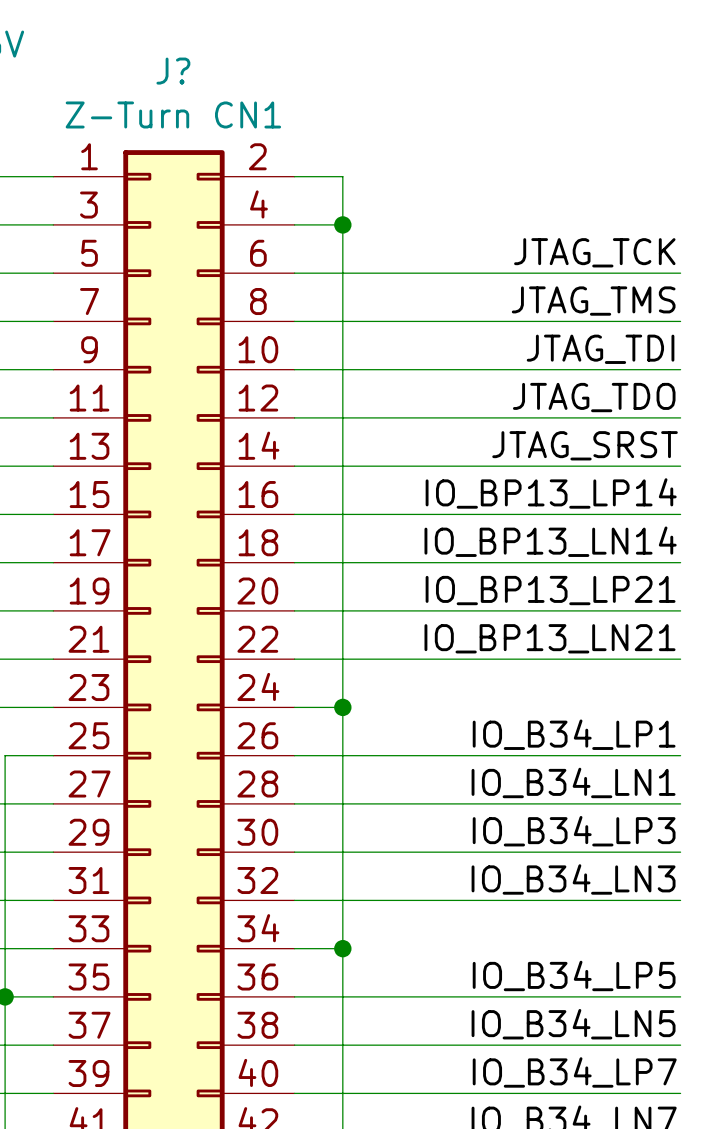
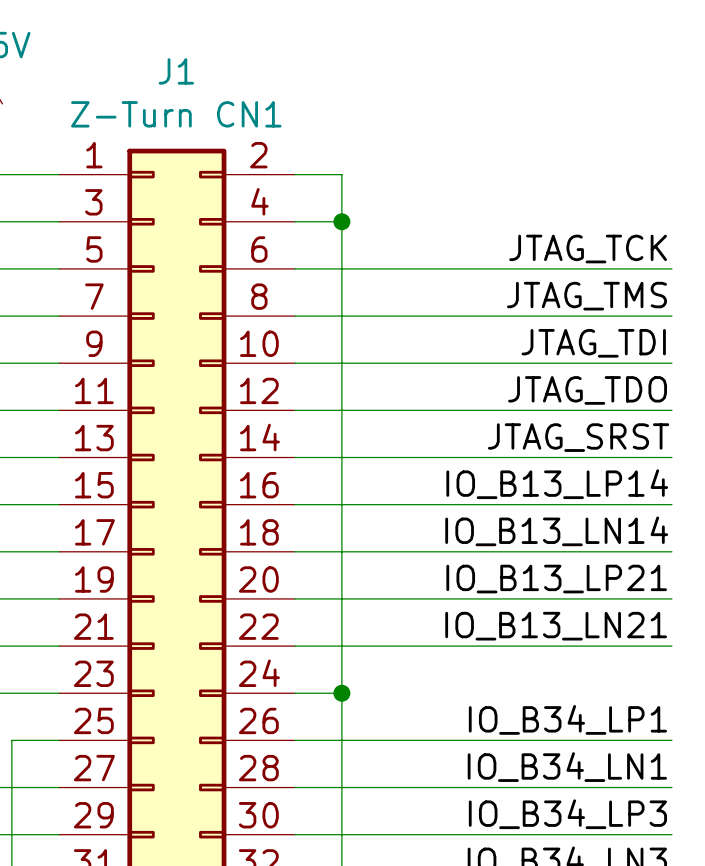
J? name: J? (173, 71) -> J1 (176, 71)
label: IO_BP13_LP14 (551, 493) -> IO_B13_LP14 (557, 484)
label: IO_BP13_LN14 (550, 541) -> IO_B13_LN14 (556, 531)
label: IO_BP13_LP21 (550, 590) -> IO_B13_LP21 (556, 579)
label: IO_BP13_LN21 (550, 638) -> IO_B13_LN21 (556, 626)

